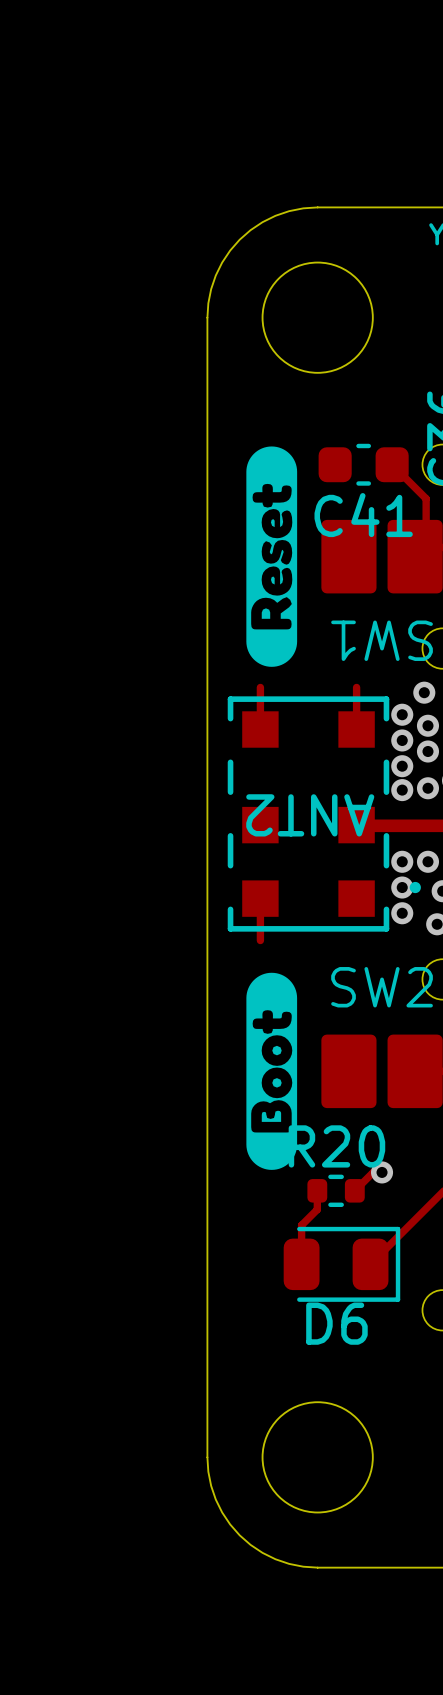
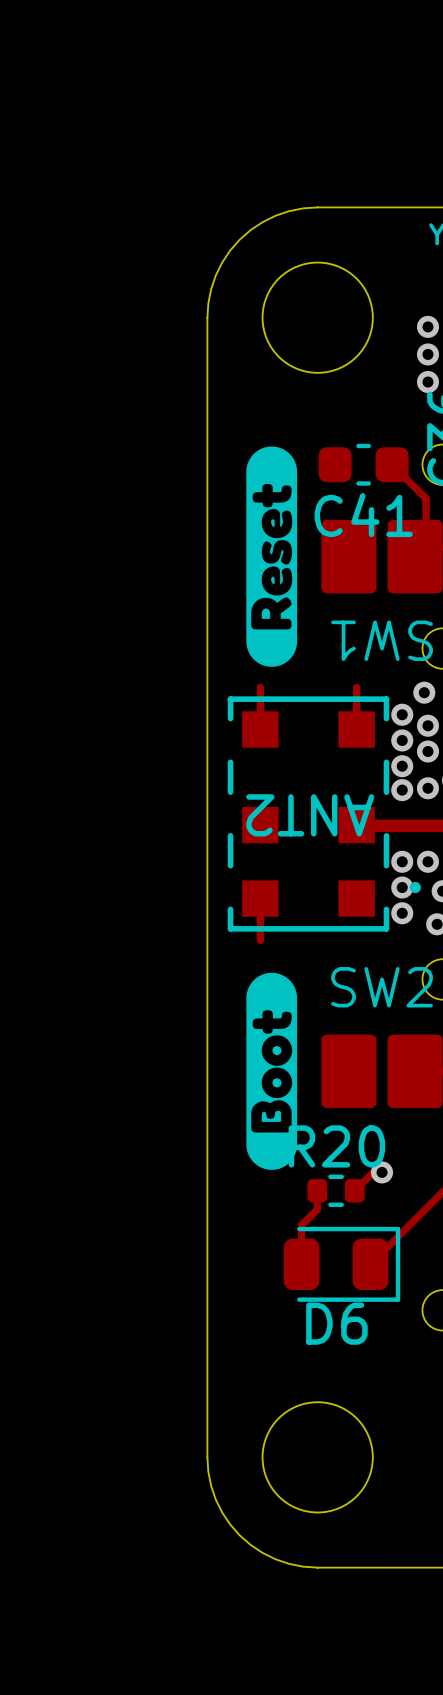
via: none -> (427, 326)
via: none -> (427, 354)
via: none -> (427, 382)

